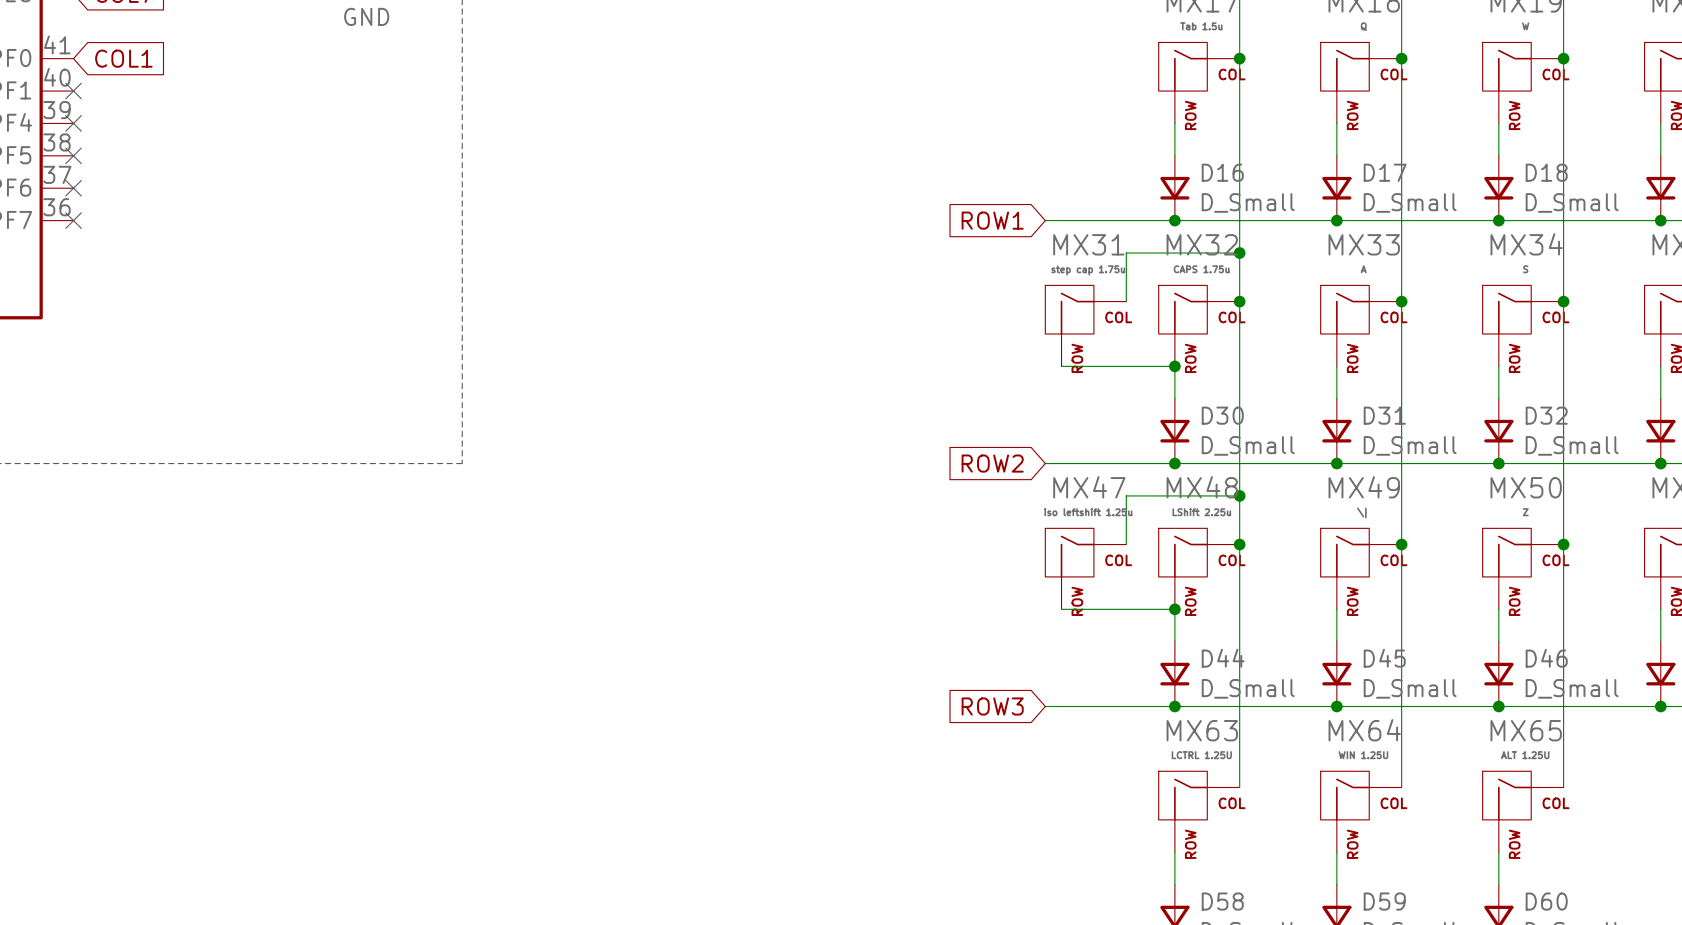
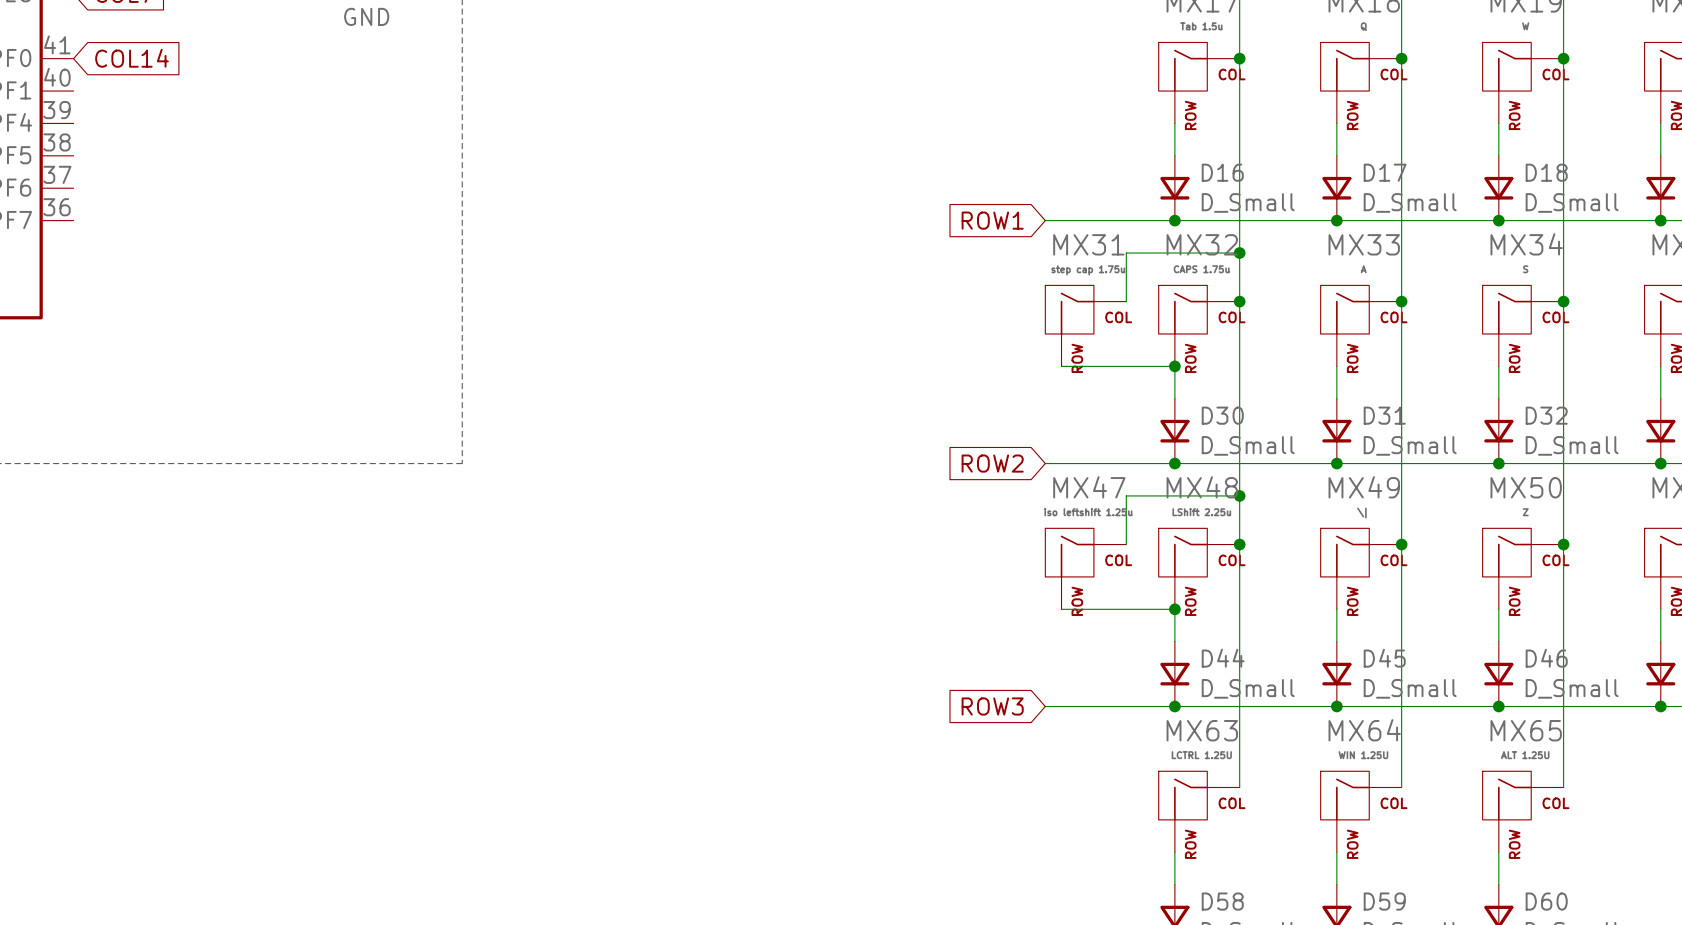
global label: COL1 (123, 58) -> COL14 (132, 58)
no-connect mark: (73, 91) -> none
no-connect mark: (73, 123) -> none
no-connect mark: (73, 155) -> none
no-connect mark: (73, 188) -> none
no-connect mark: (73, 220) -> none

